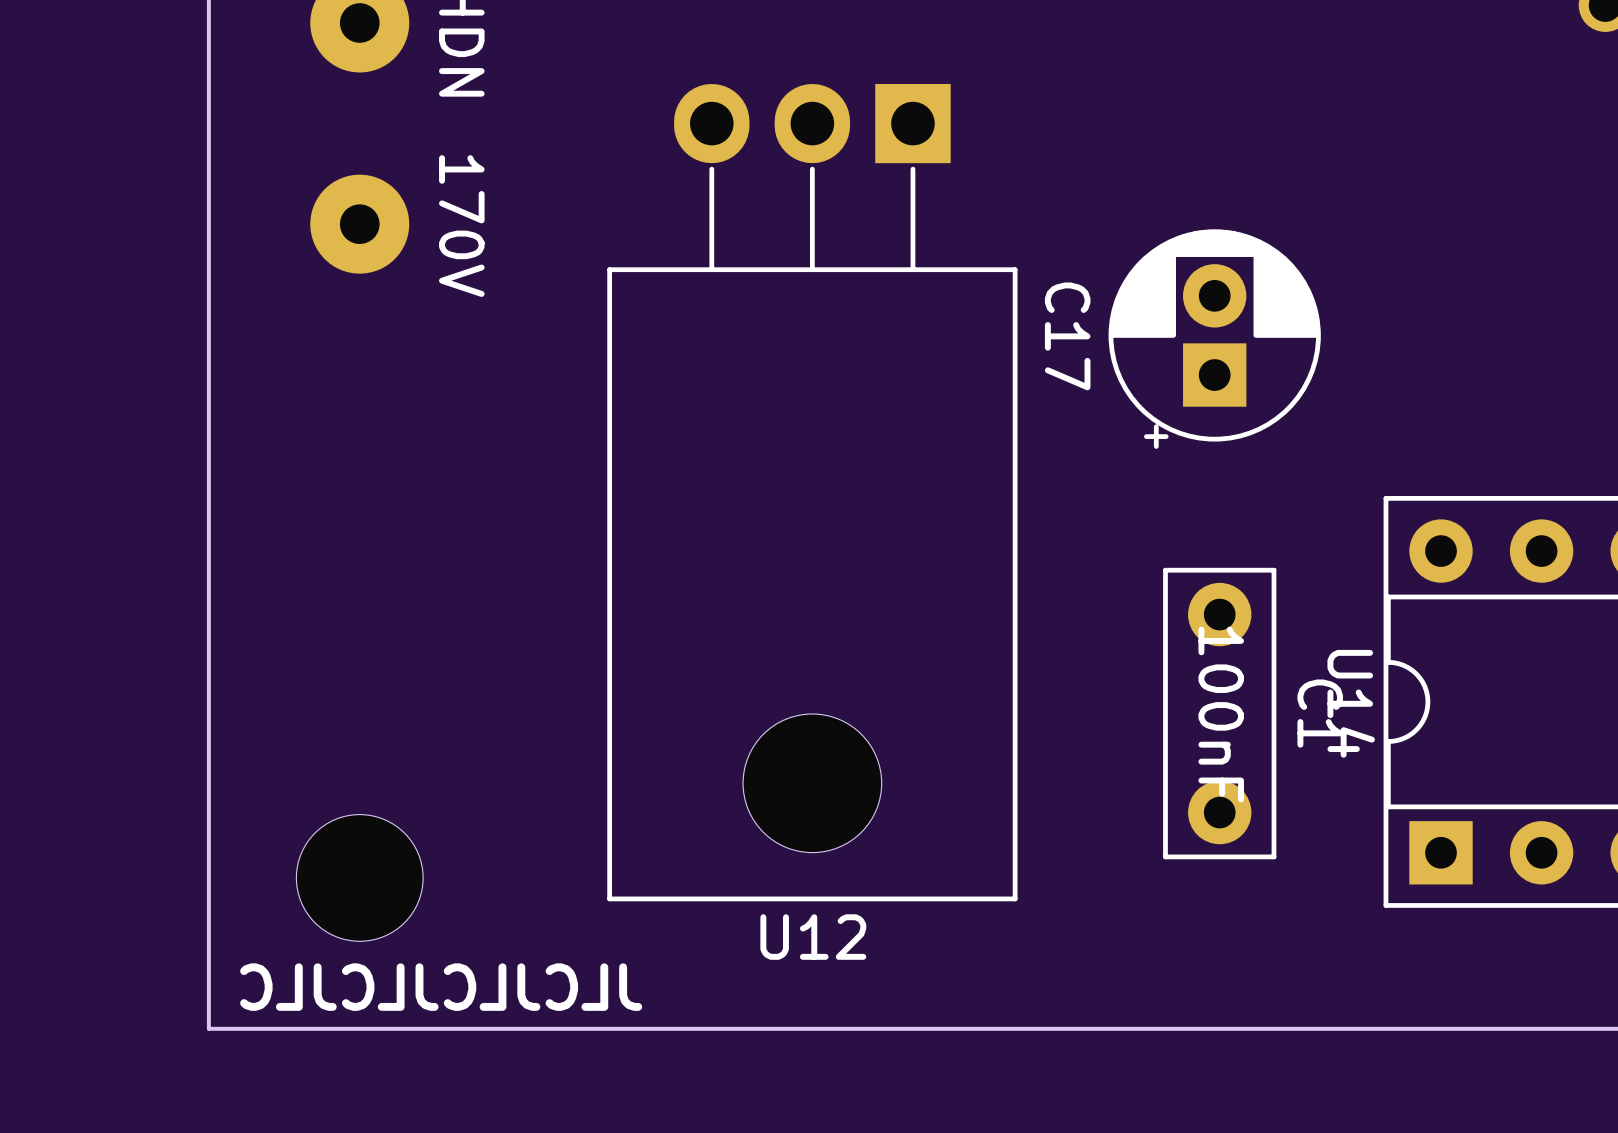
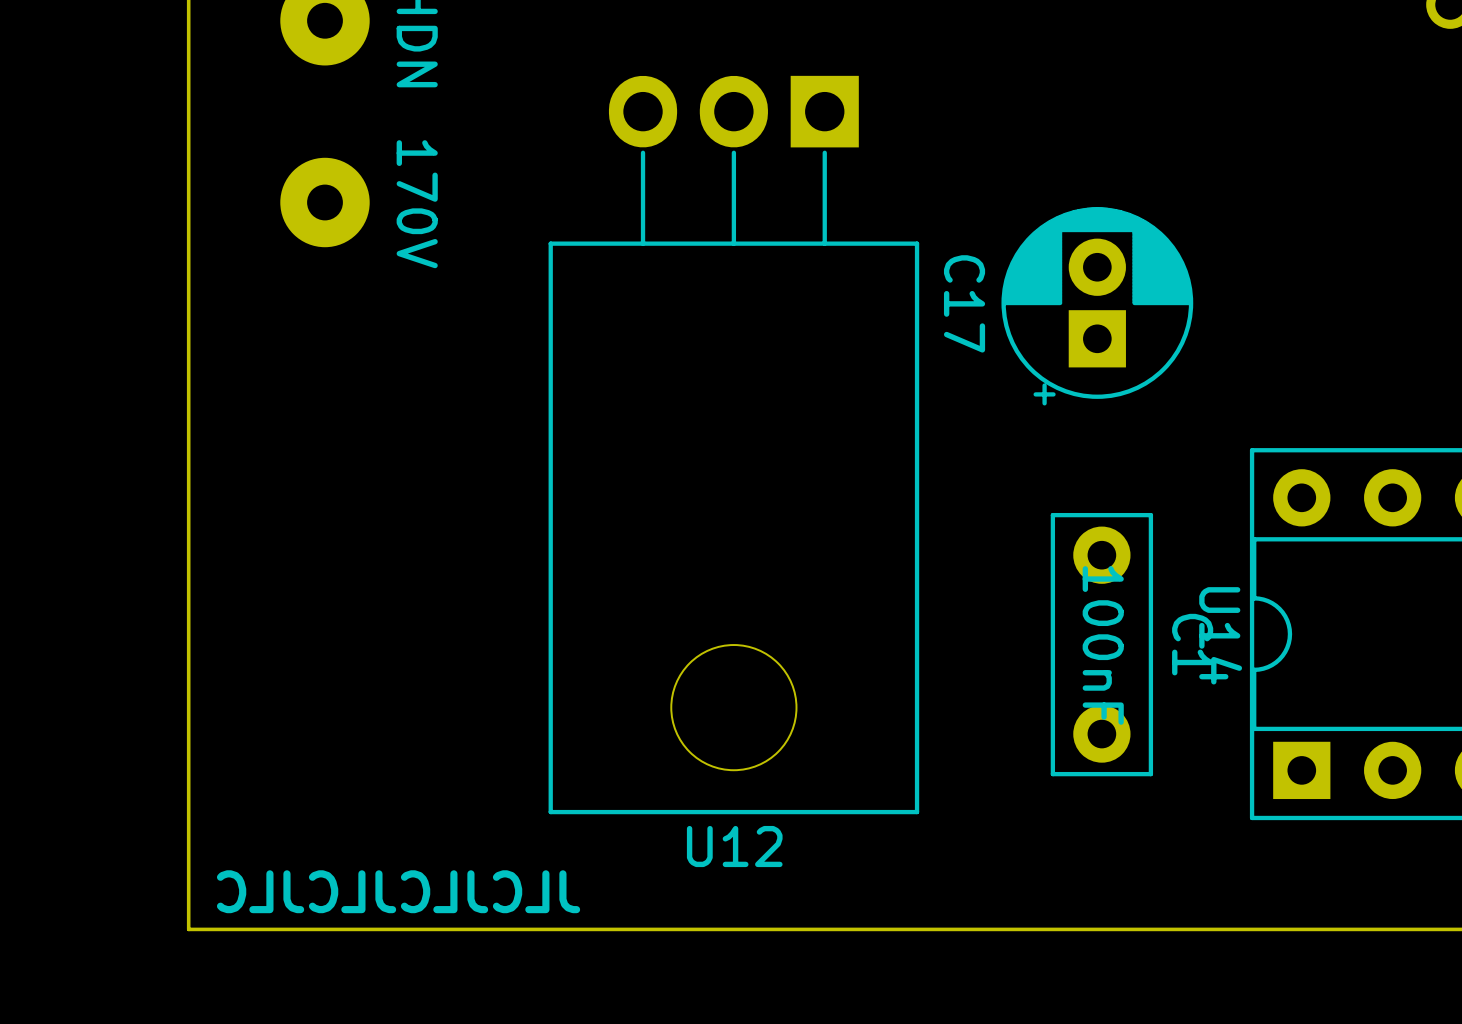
part: (359, 877) -> none

